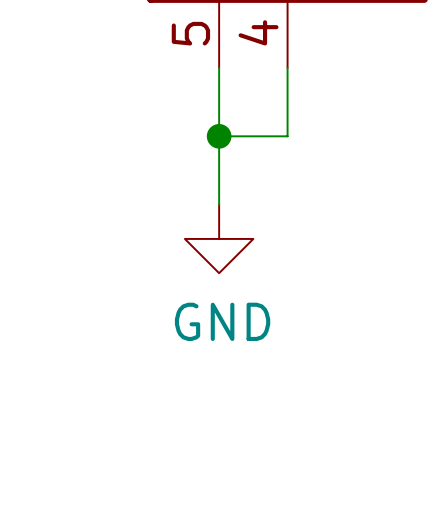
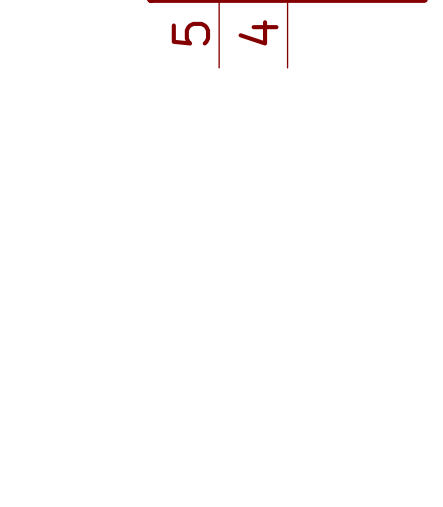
wire: (219, 67) (219, 204) -> none
wire: (287, 67) (287, 136) (219, 136) -> none
junction: (219, 136) -> none
power symbol: GND (219, 238) -> none

